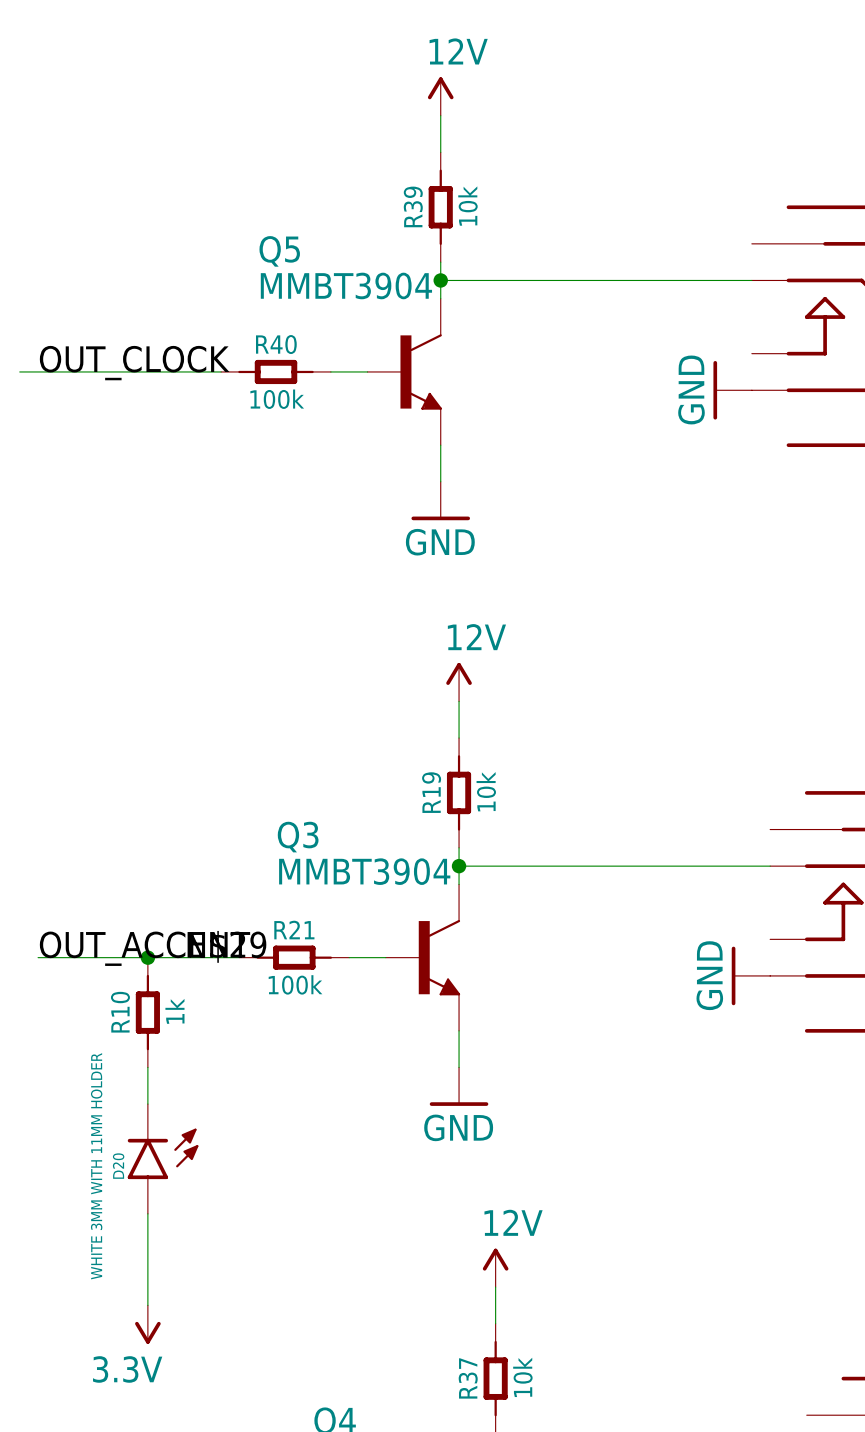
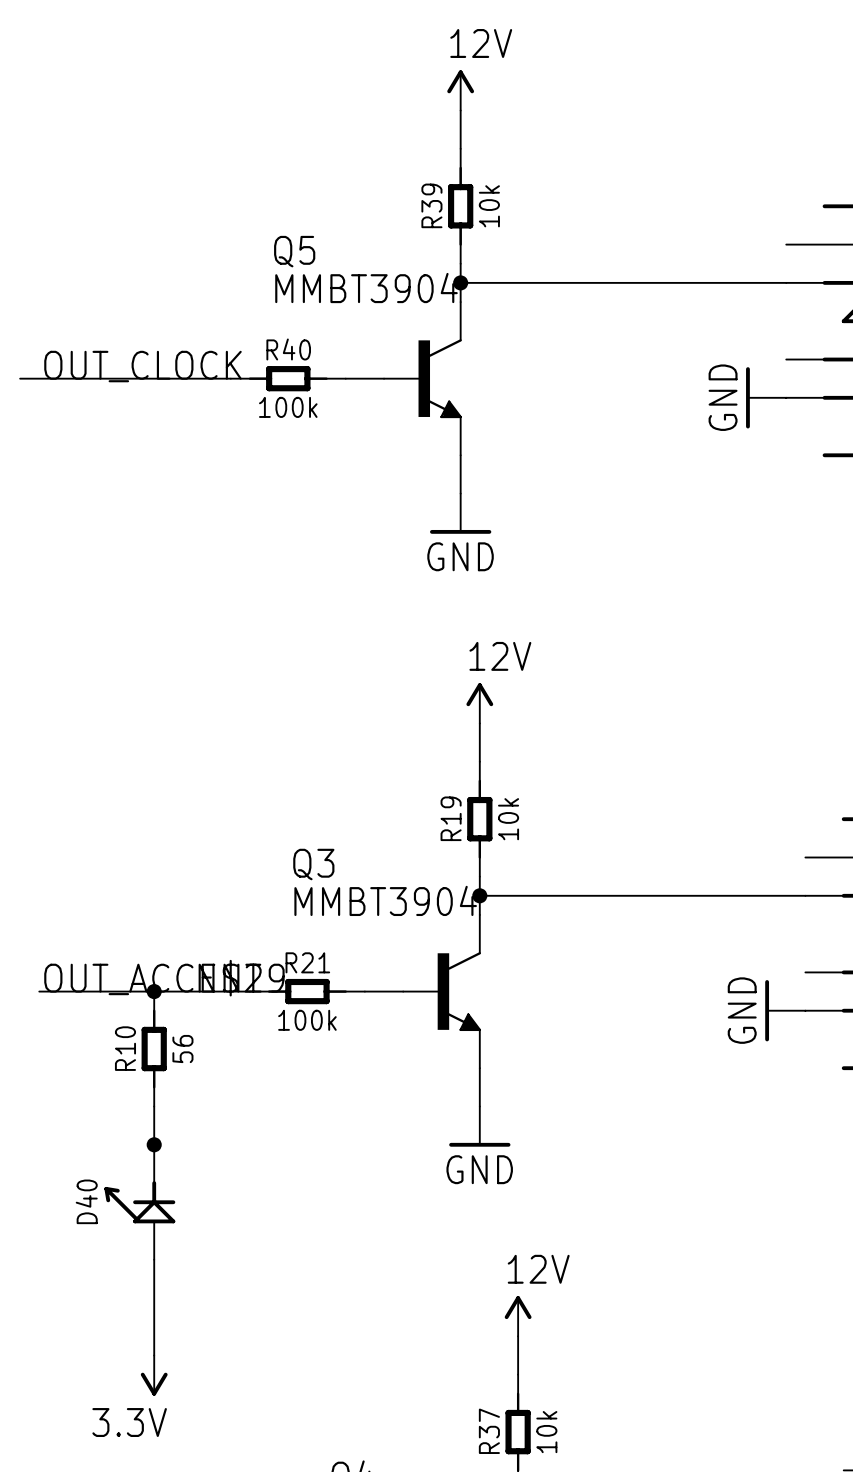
R10 value: 1k (174, 1011) -> 56 (182, 1049)
junction: none -> (154, 1144)
D40: none -> (139, 1202)
D20: WHITE 3MM WITH 11MM HOLDER (163, 1158) -> none

